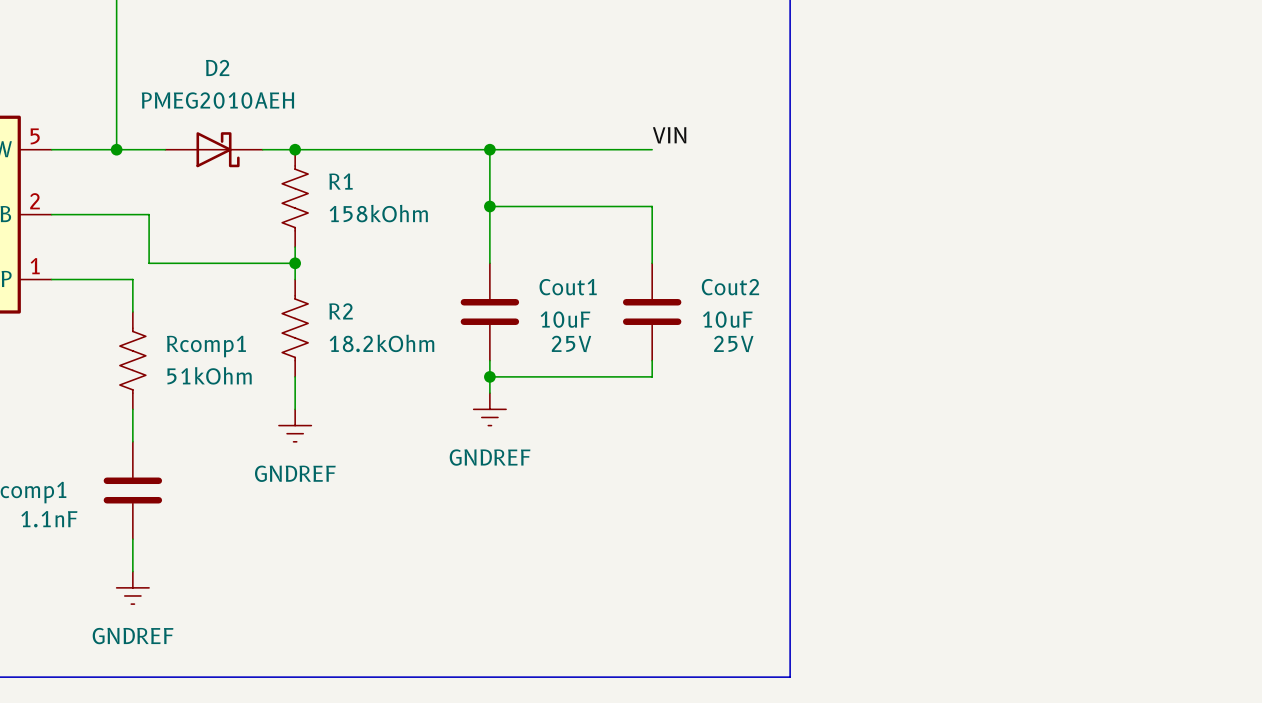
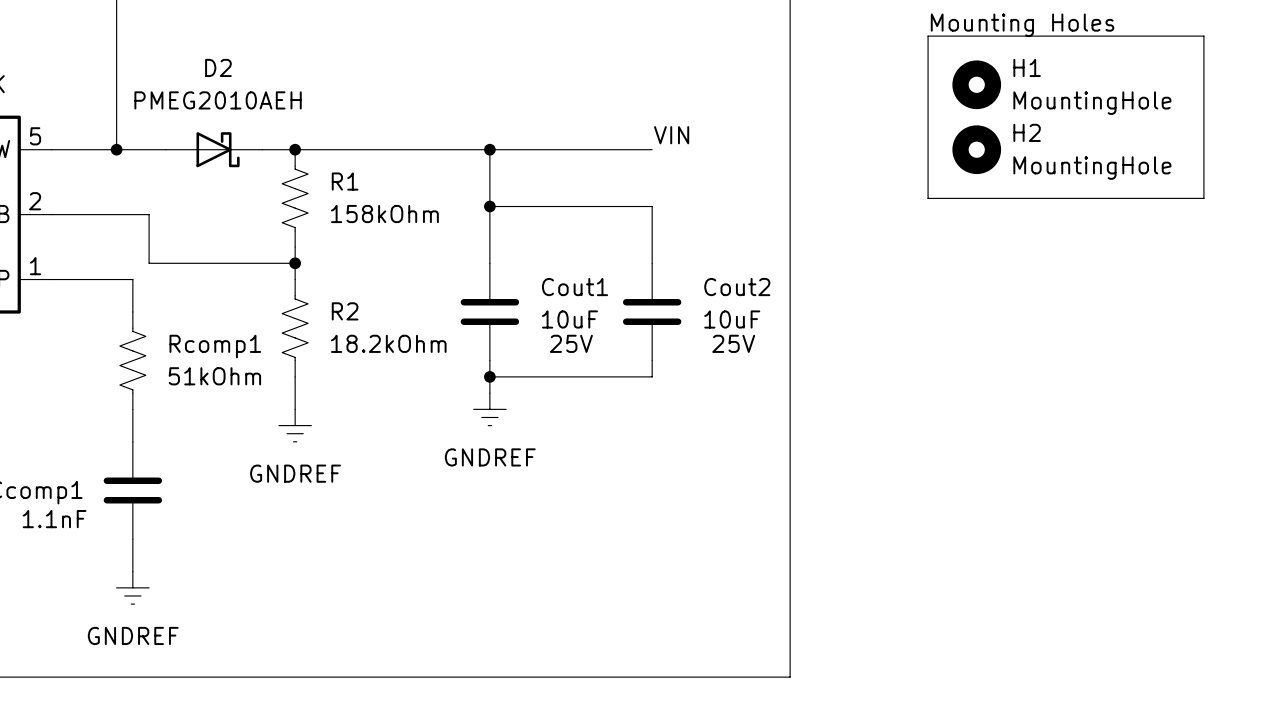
text: none -> Mounting Holes (1022, 25)
line: none -> (928, 36) (1203, 36) (1203, 198) (928, 198) (928, 36)
H1: none -> MountingHole (976, 84)
H2: none -> MountingHole (976, 149)

